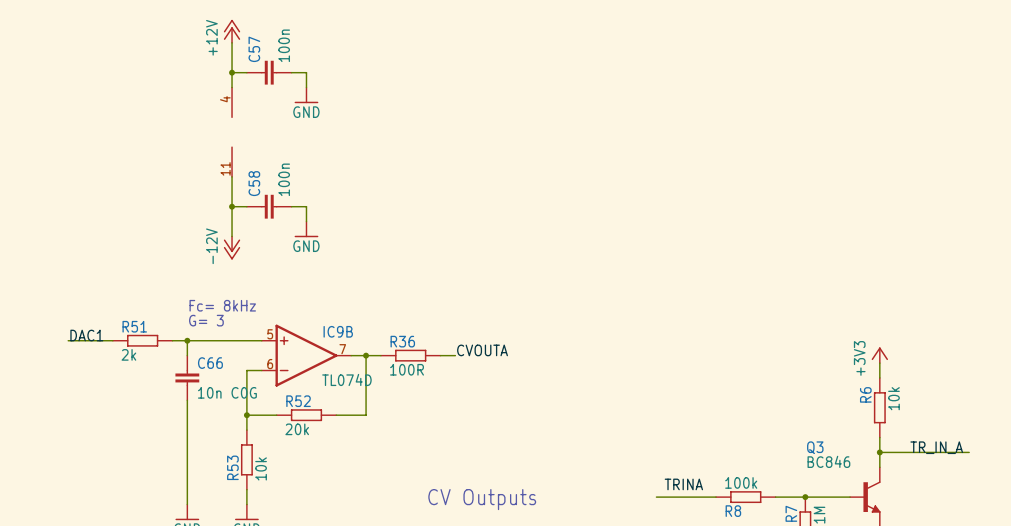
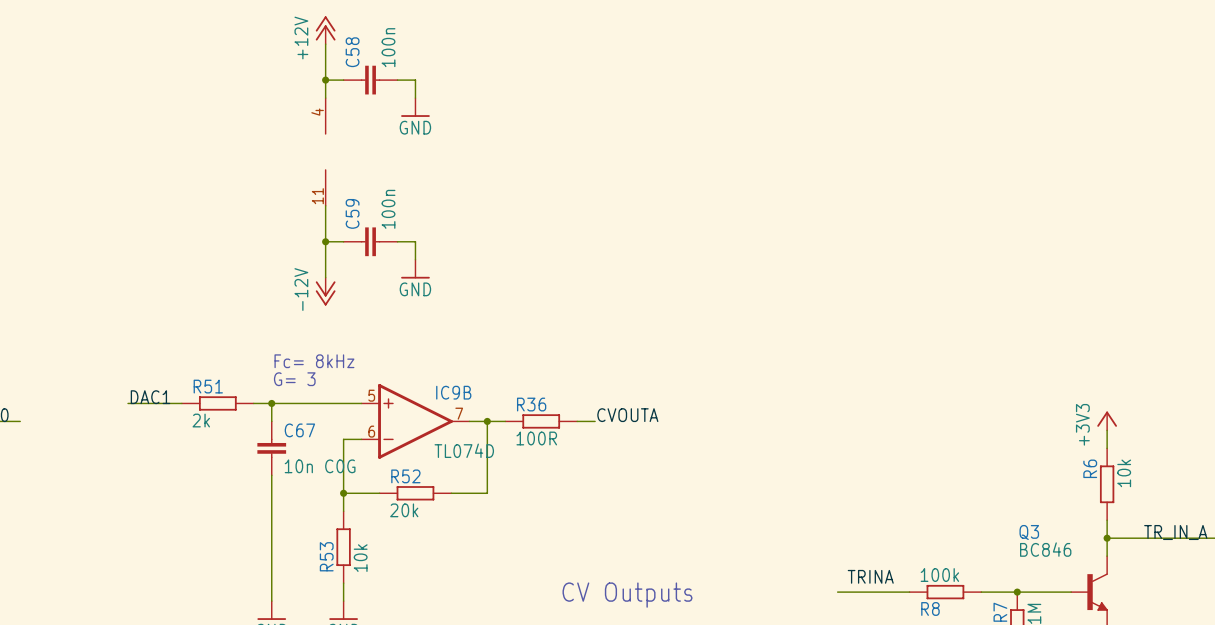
C57 name: C57 (254, 49) -> C58 (352, 52)
C58 name: C58 (254, 183) -> C59 (352, 213)
C66 name: C66 (210, 363) -> C67 (299, 430)

